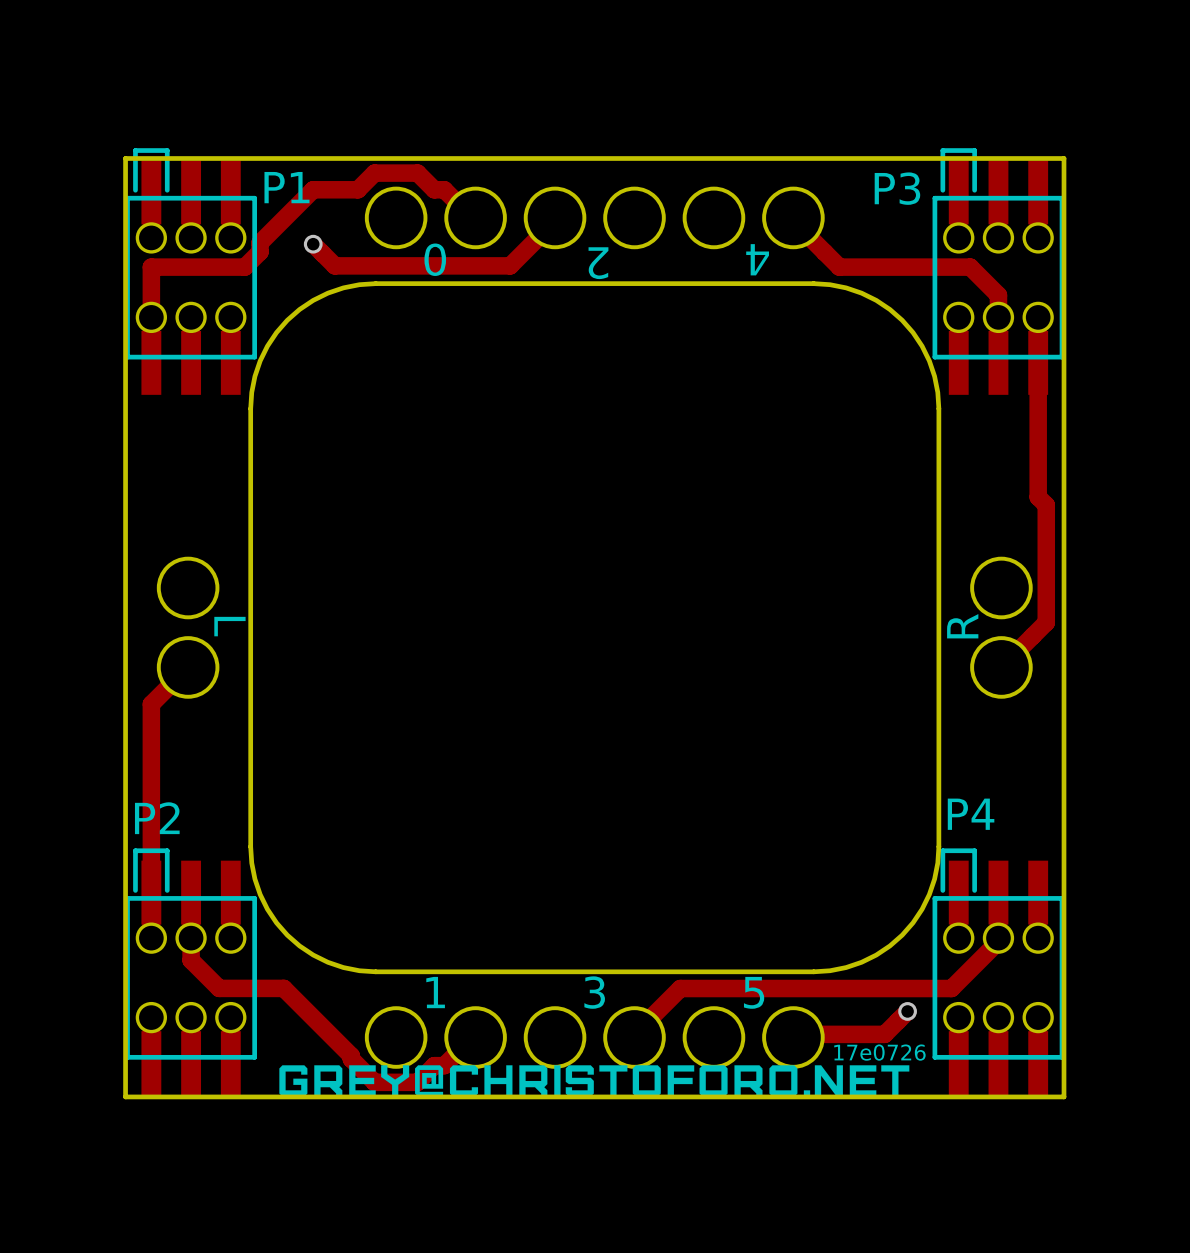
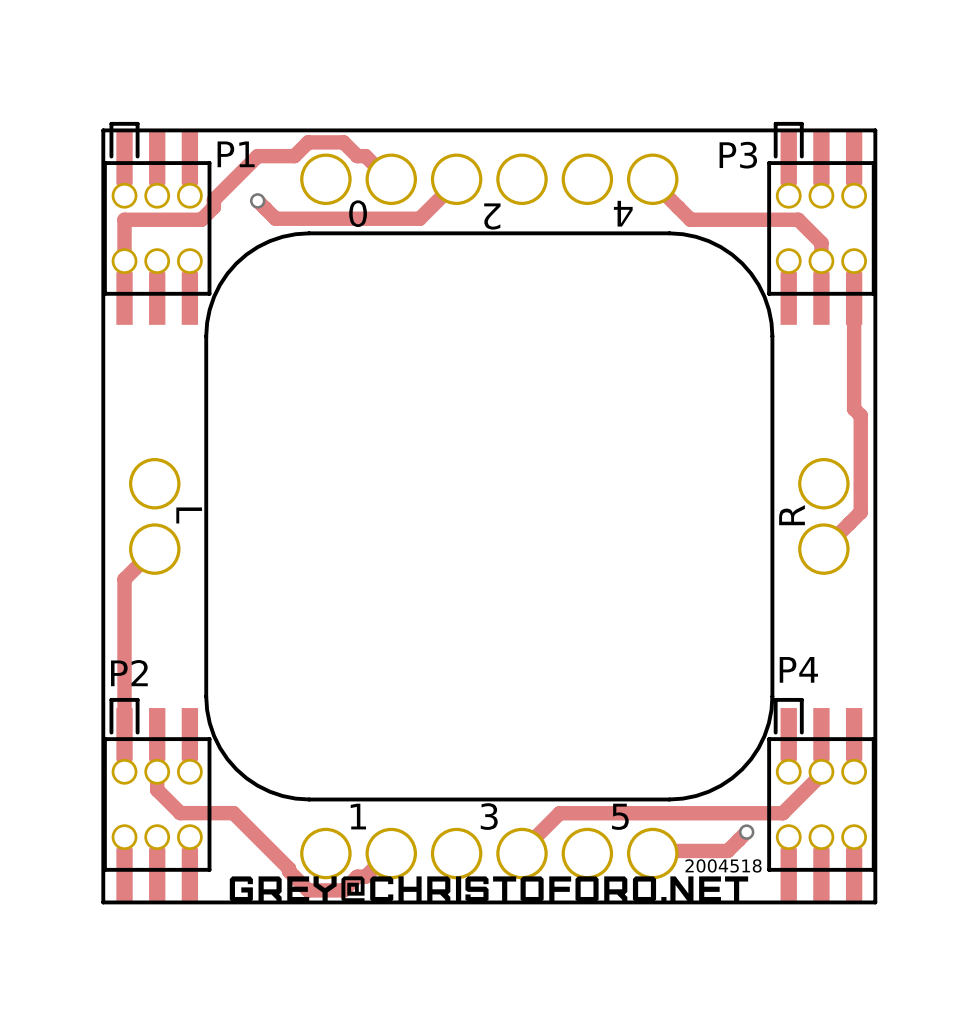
text: 17e0726 (879, 1052) -> 2004518 (723, 865)

